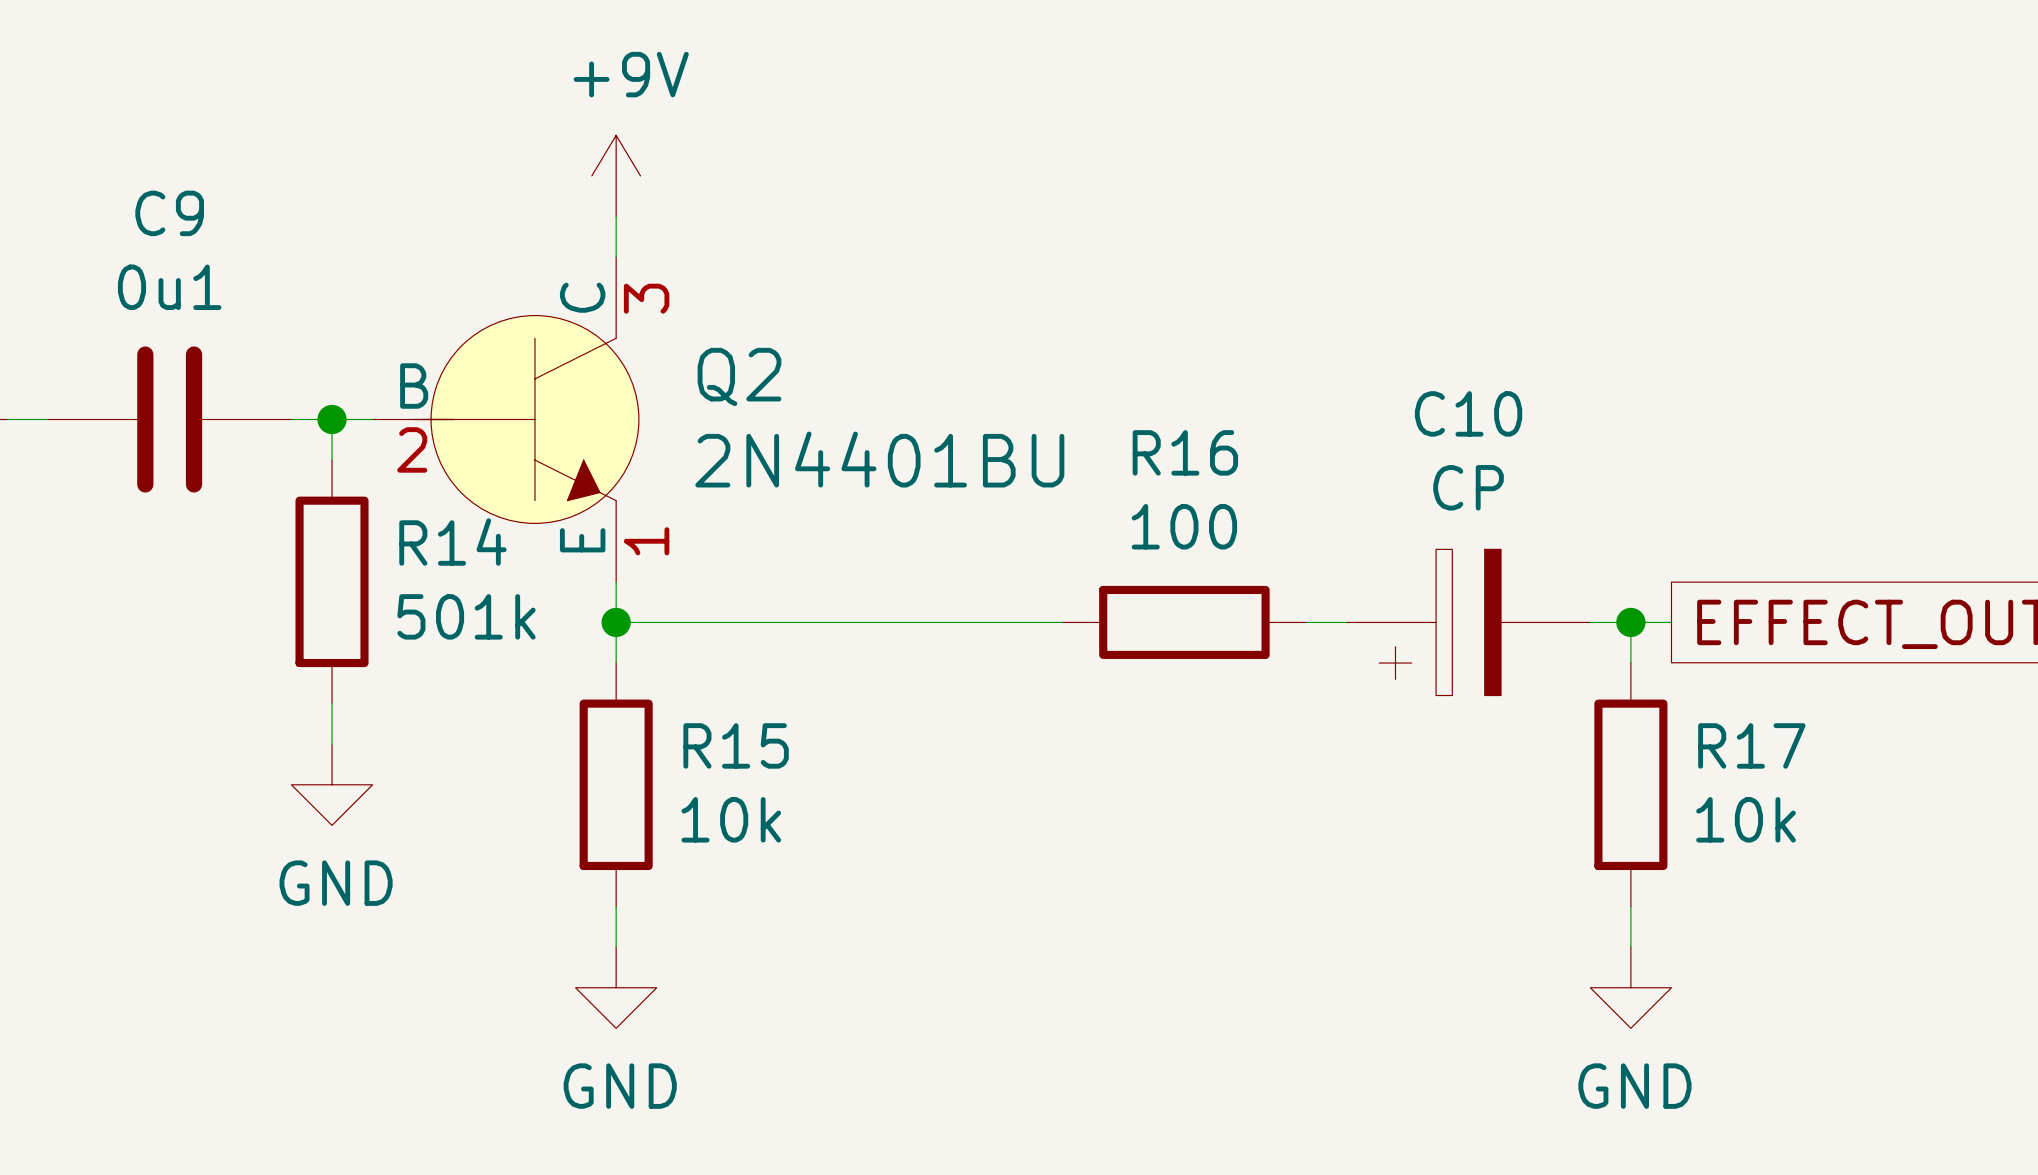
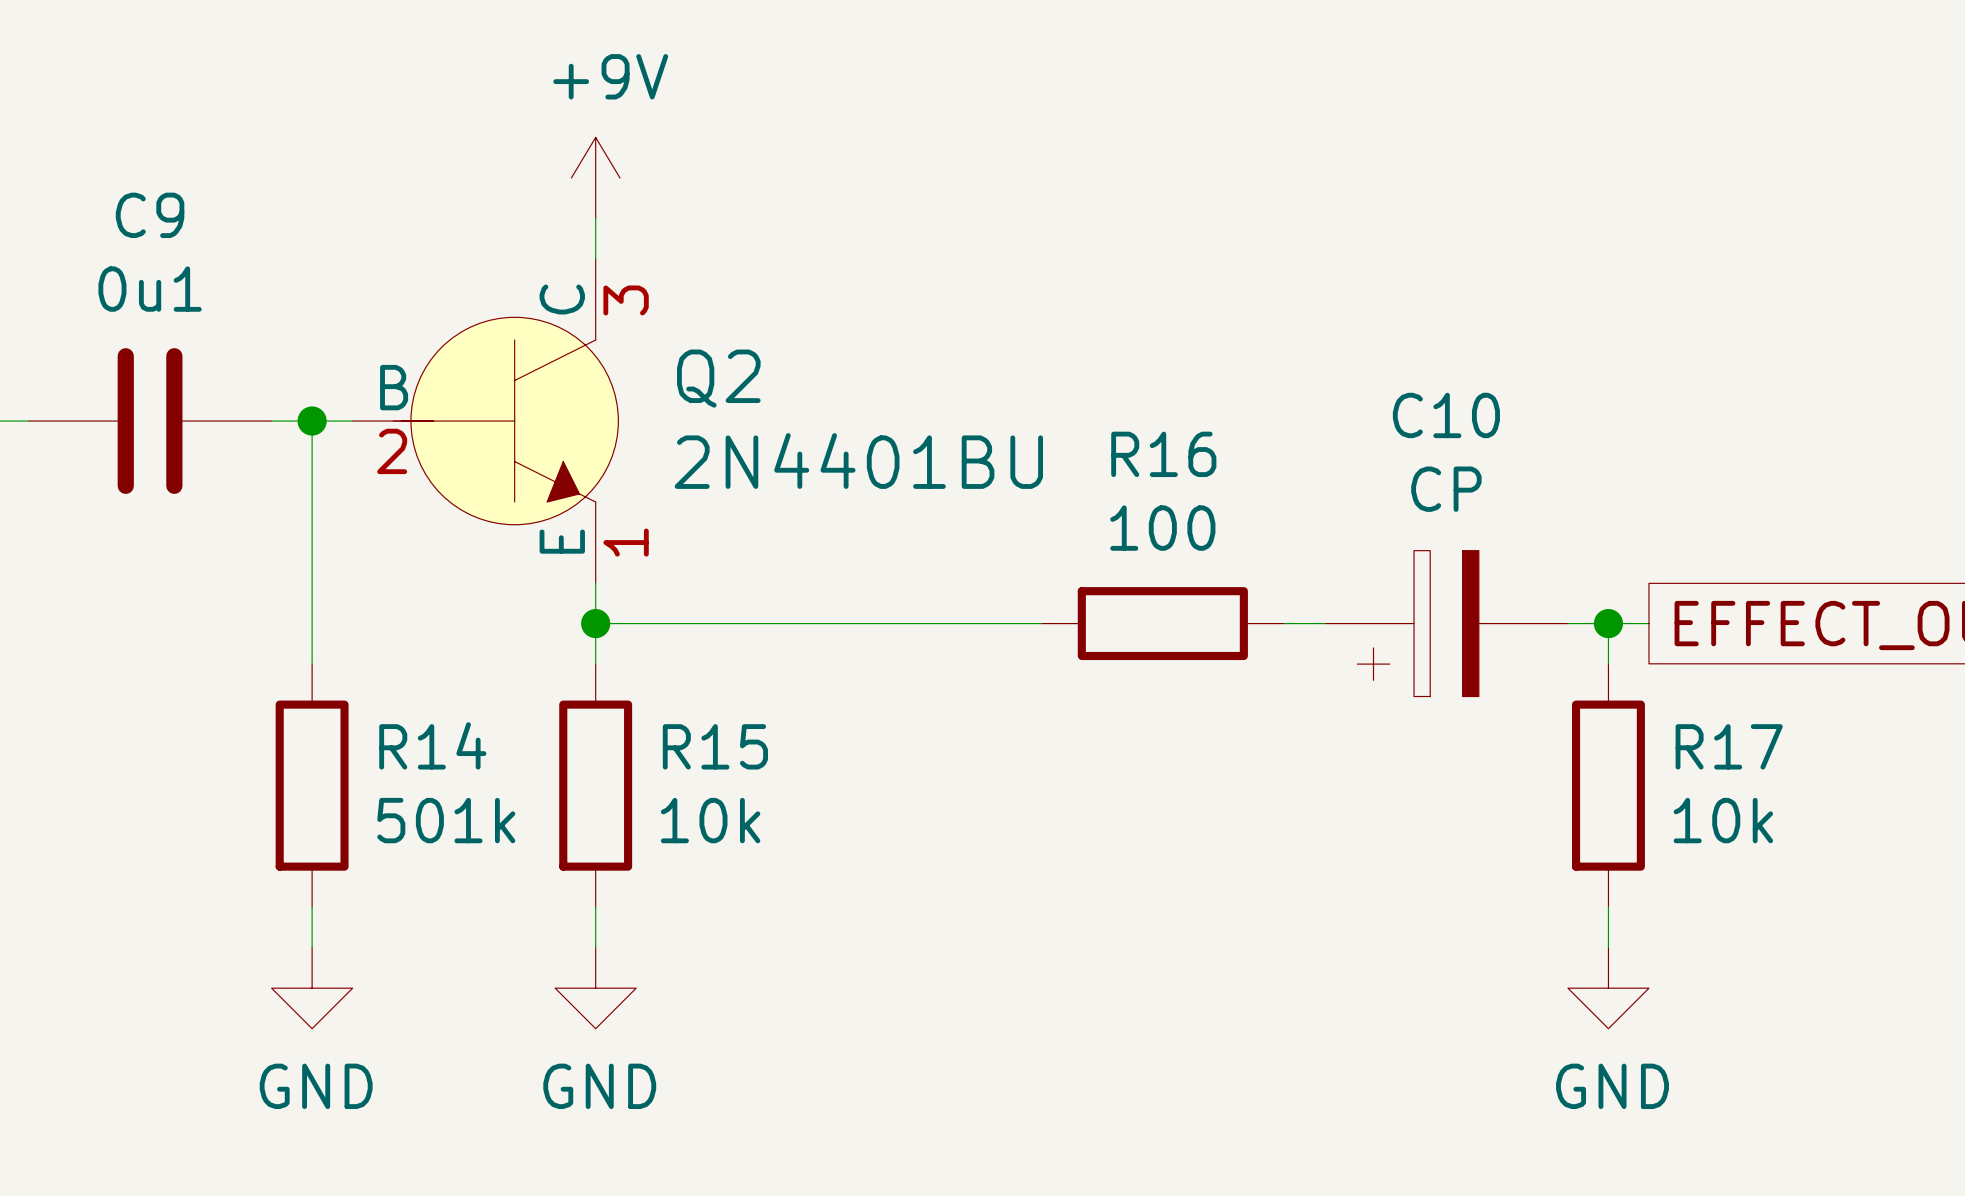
wire: none -> (312, 461) (312, 664)
R14 position: (332, 581) -> (312, 785)
wire: (332, 703) (332, 744) -> (312, 907) (312, 947)
power symbol position: GND (332, 784) -> GND (312, 988)

